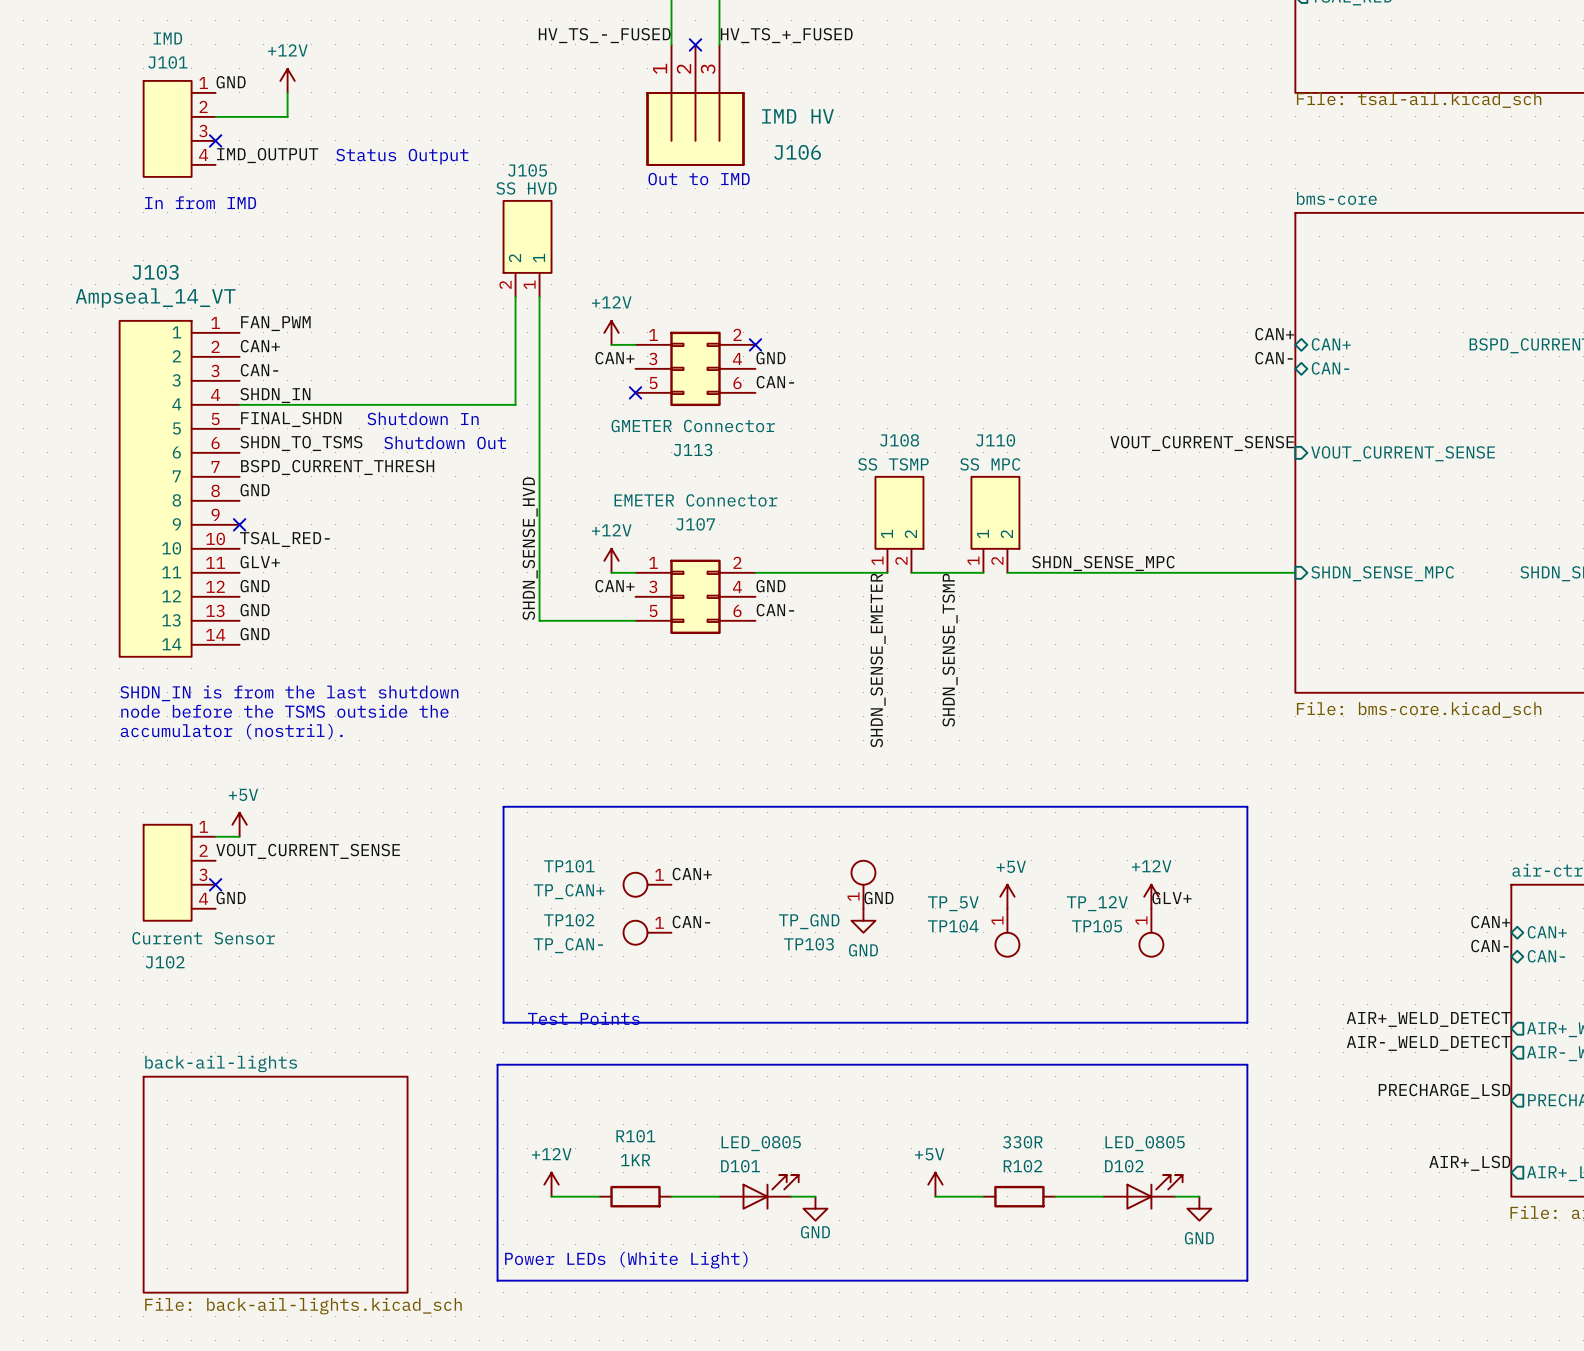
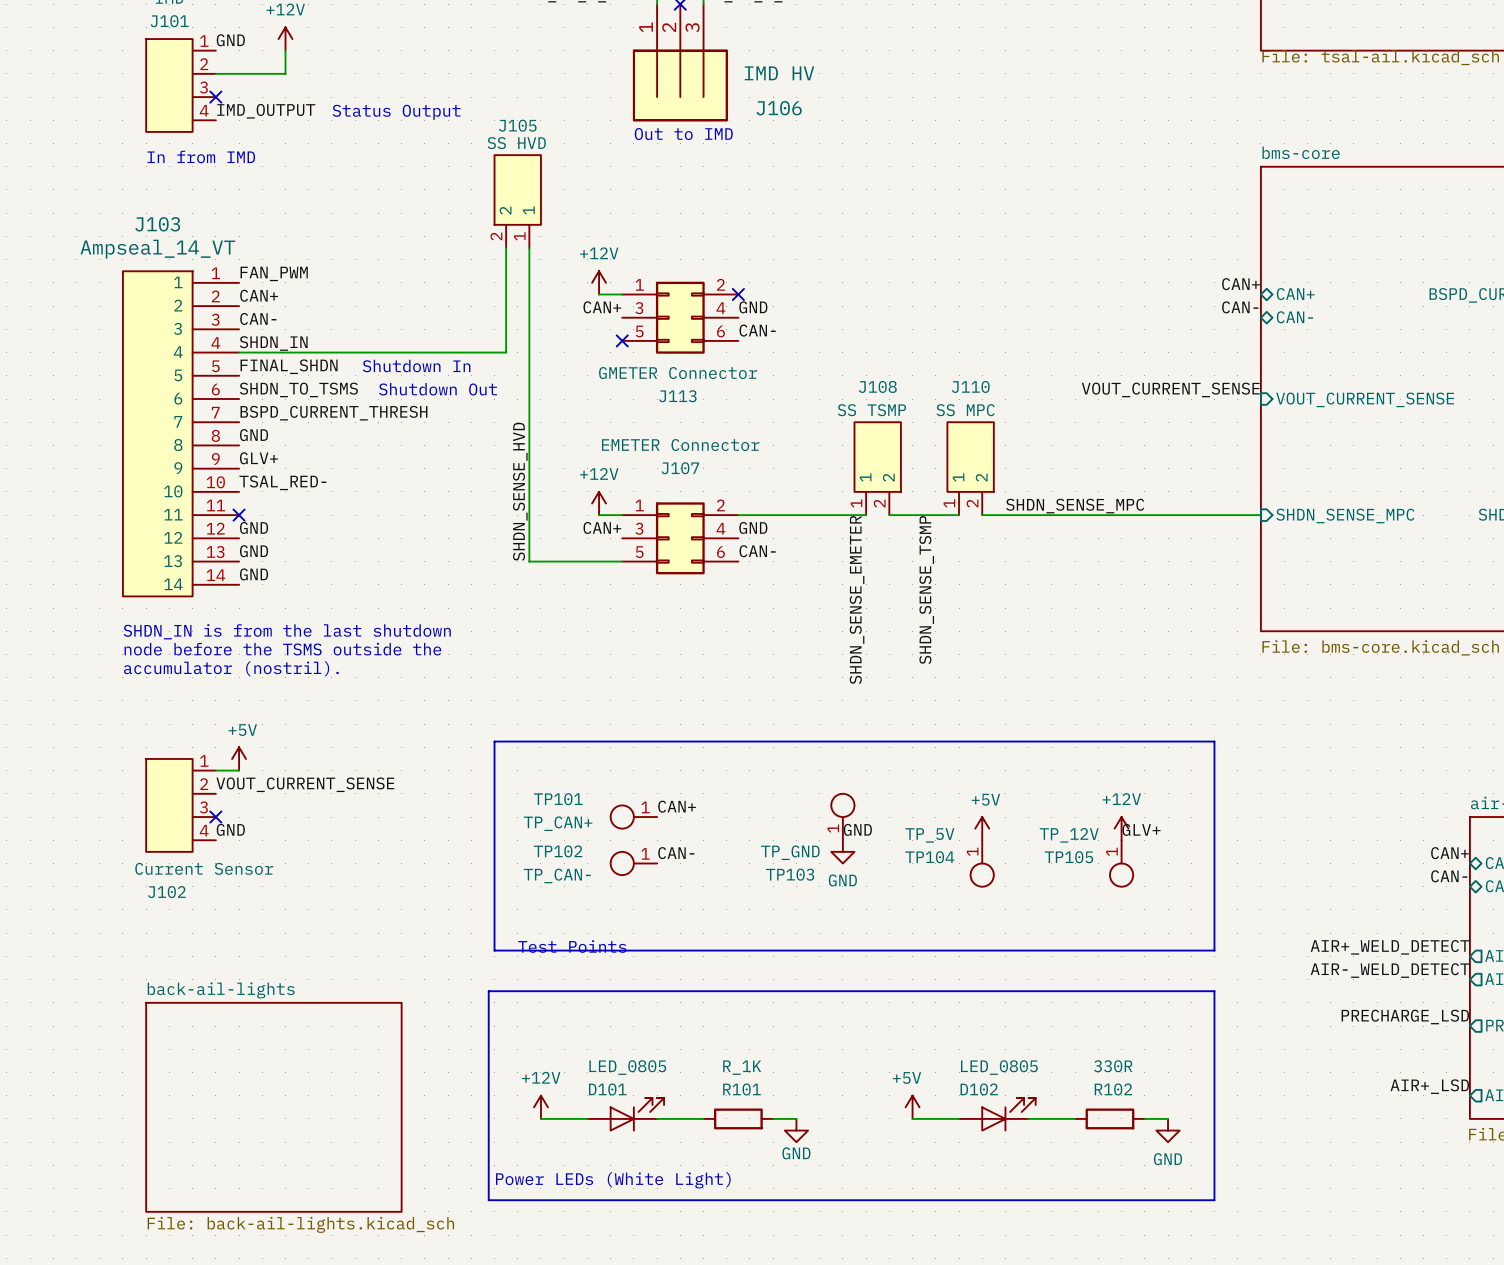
no-connect mark position: (239, 524) -> (239, 515)
label position: GLV+ (260, 562) -> GLV+ (258, 458)
R101 name position: R101 (635, 1136) -> R101 (741, 1089)
R101 value: 1KR (635, 1160) -> R_1K (742, 1067)
D101 position: (759, 1192) -> (625, 1114)
D102 position: (1142, 1192) -> (997, 1114)
R101 position: (635, 1196) -> (738, 1118)
R102 position: (1019, 1196) -> (1109, 1118)

